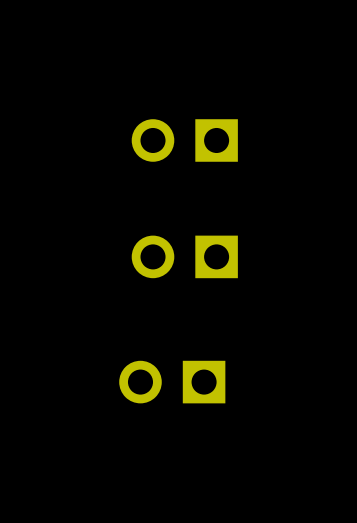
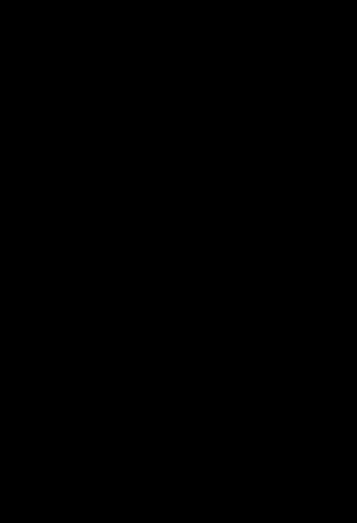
part: (184, 140) -> none
part: (184, 256) -> none
part: (172, 382) -> none

